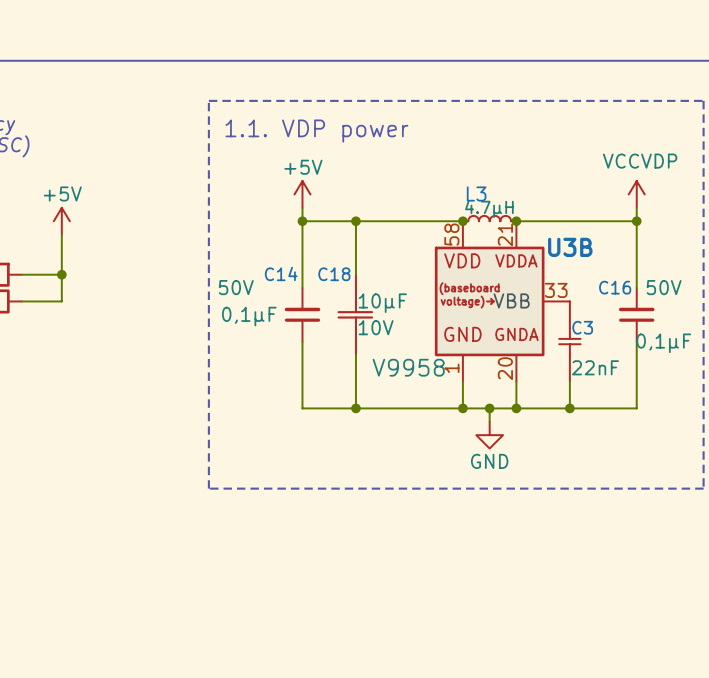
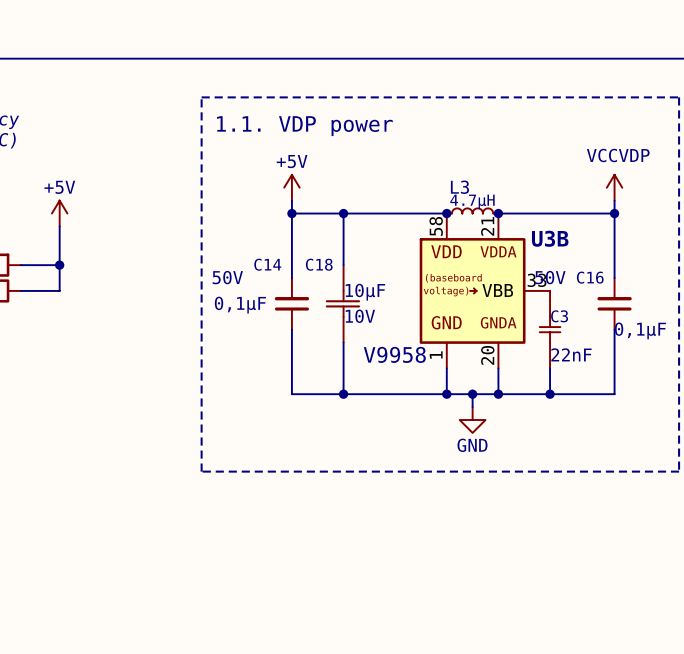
C16 text position: 50V (664, 287) -> 50V (550, 277)

